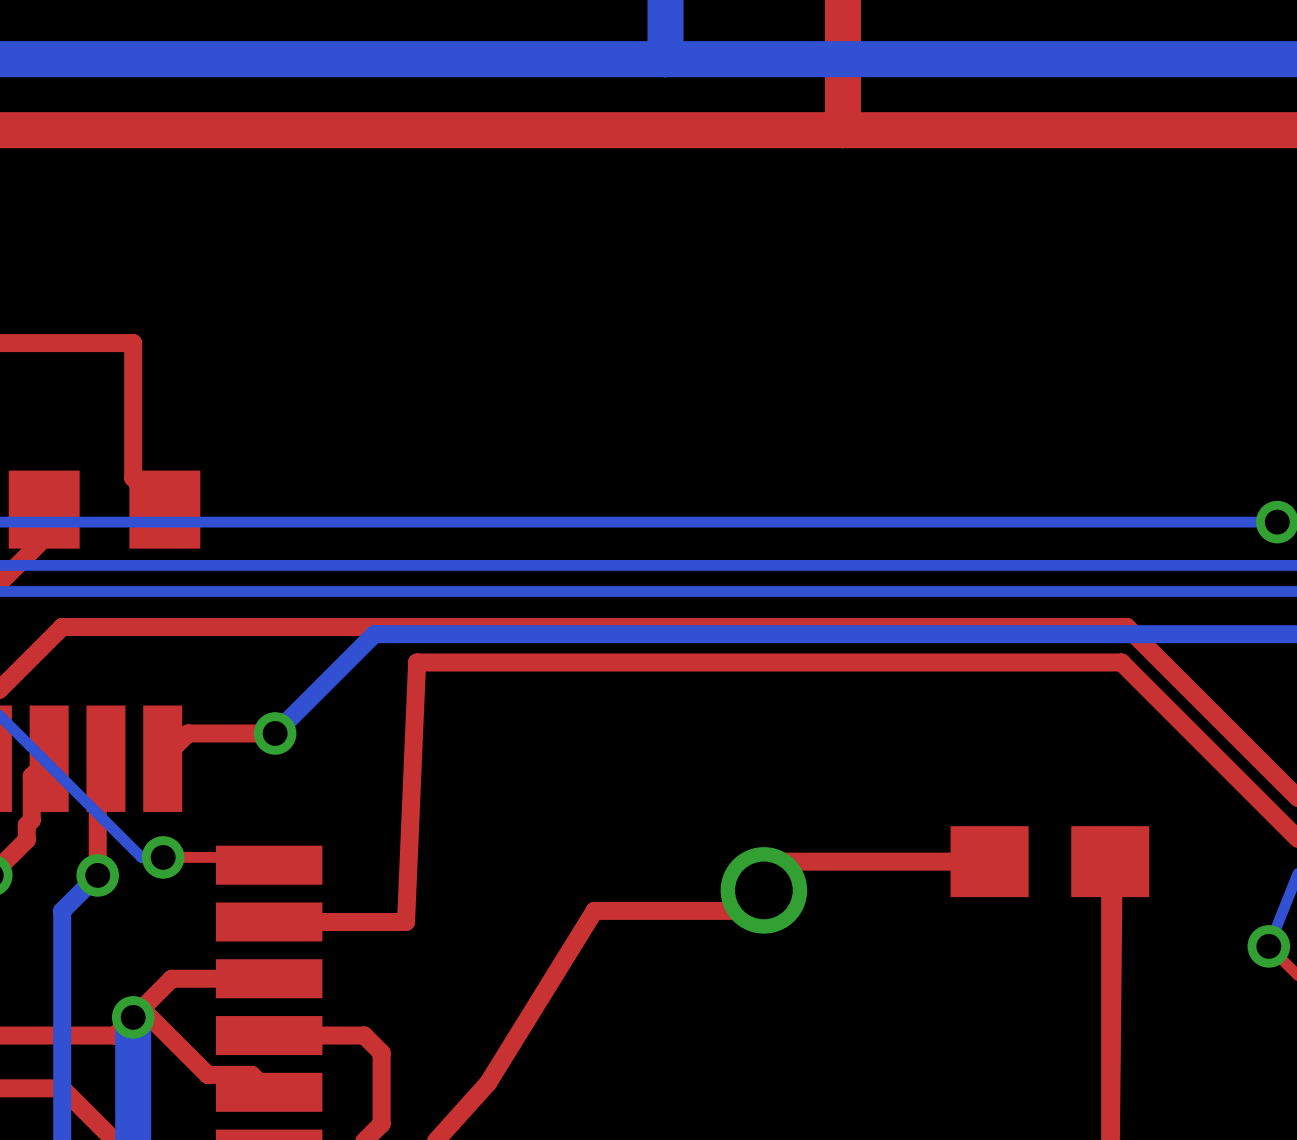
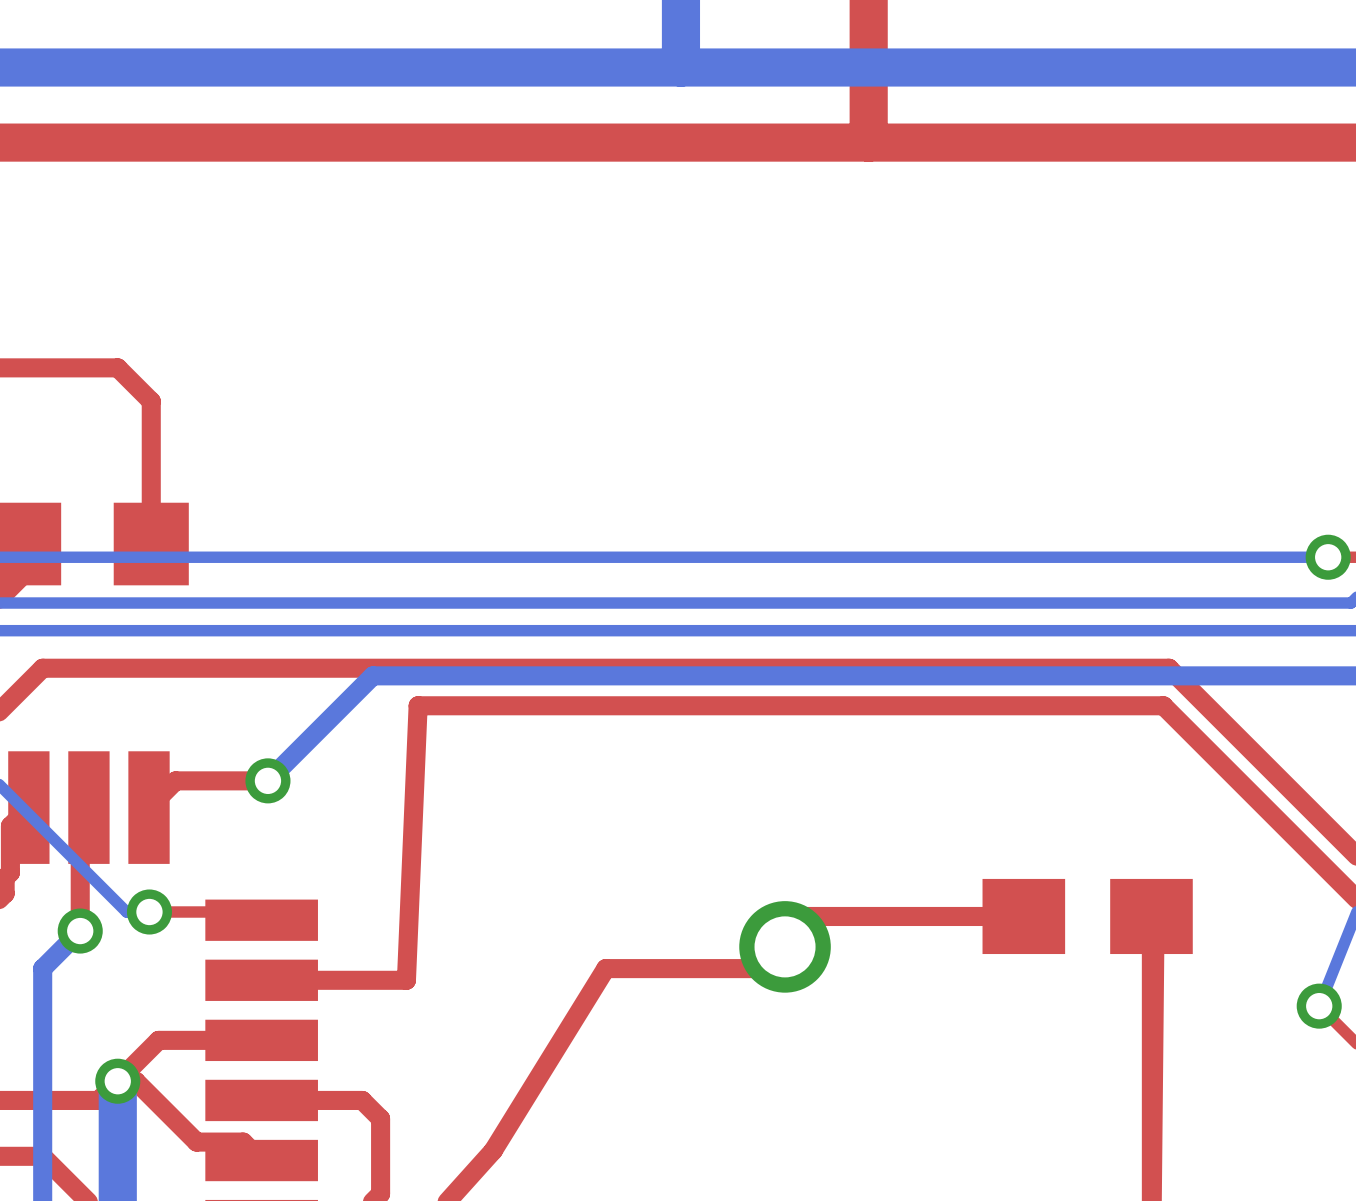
top track: (133, 343) (133, 477) (164, 509) -> (117, 367) (151, 401) (151, 544)

